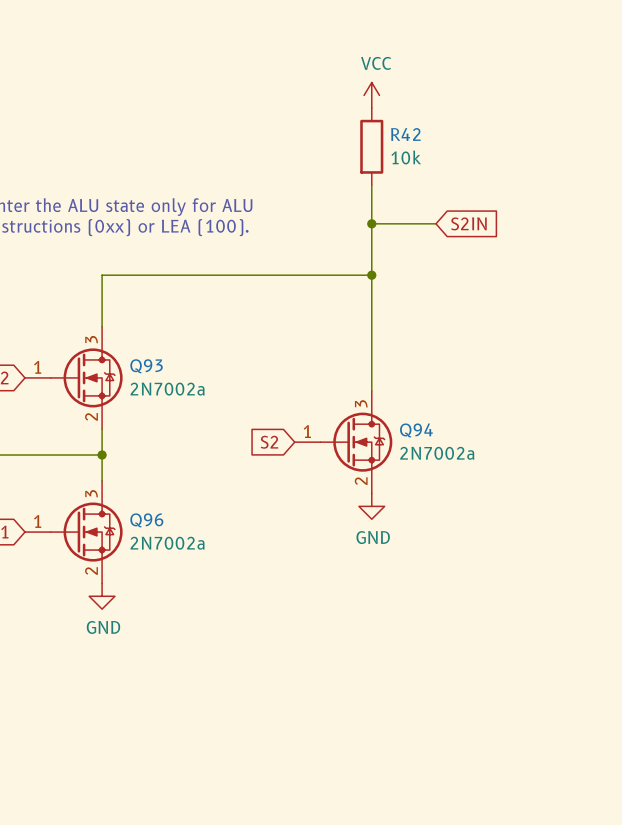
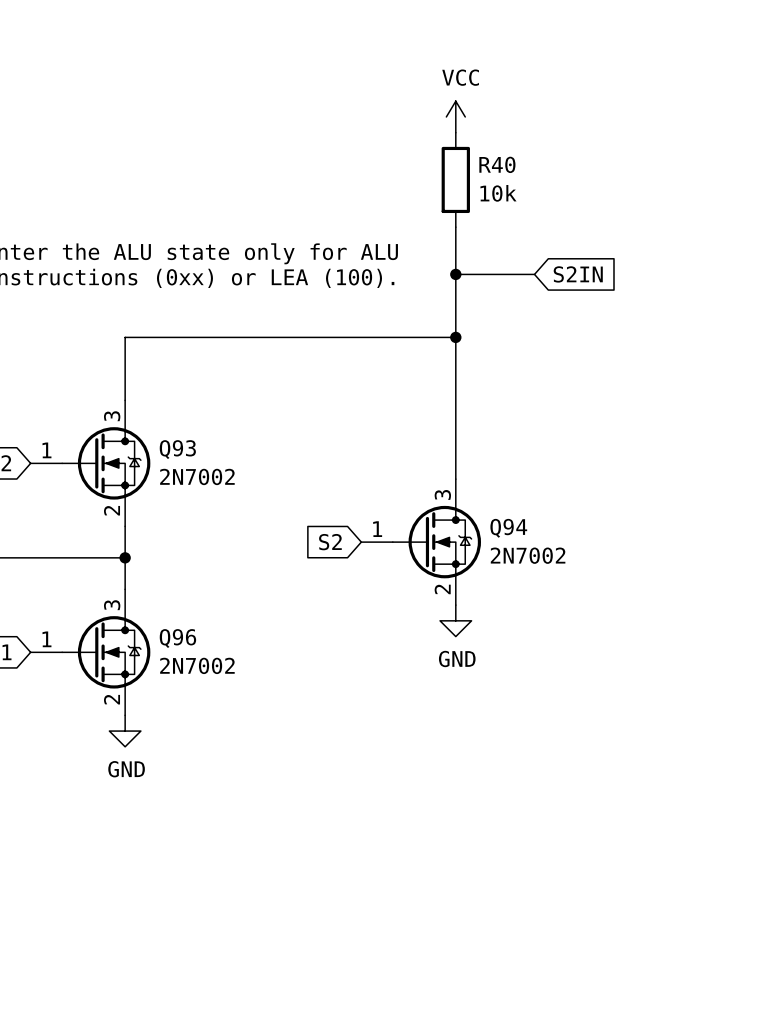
R42 name: R42 (405, 134) -> R40 (497, 164)
Q93 value: 2N7002a (167, 389) -> 2N7002 (197, 476)
Q94 value: 2N7002a (437, 453) -> 2N7002 (528, 555)
Q96 value: 2N7002a (167, 543) -> 2N7002 (197, 665)

